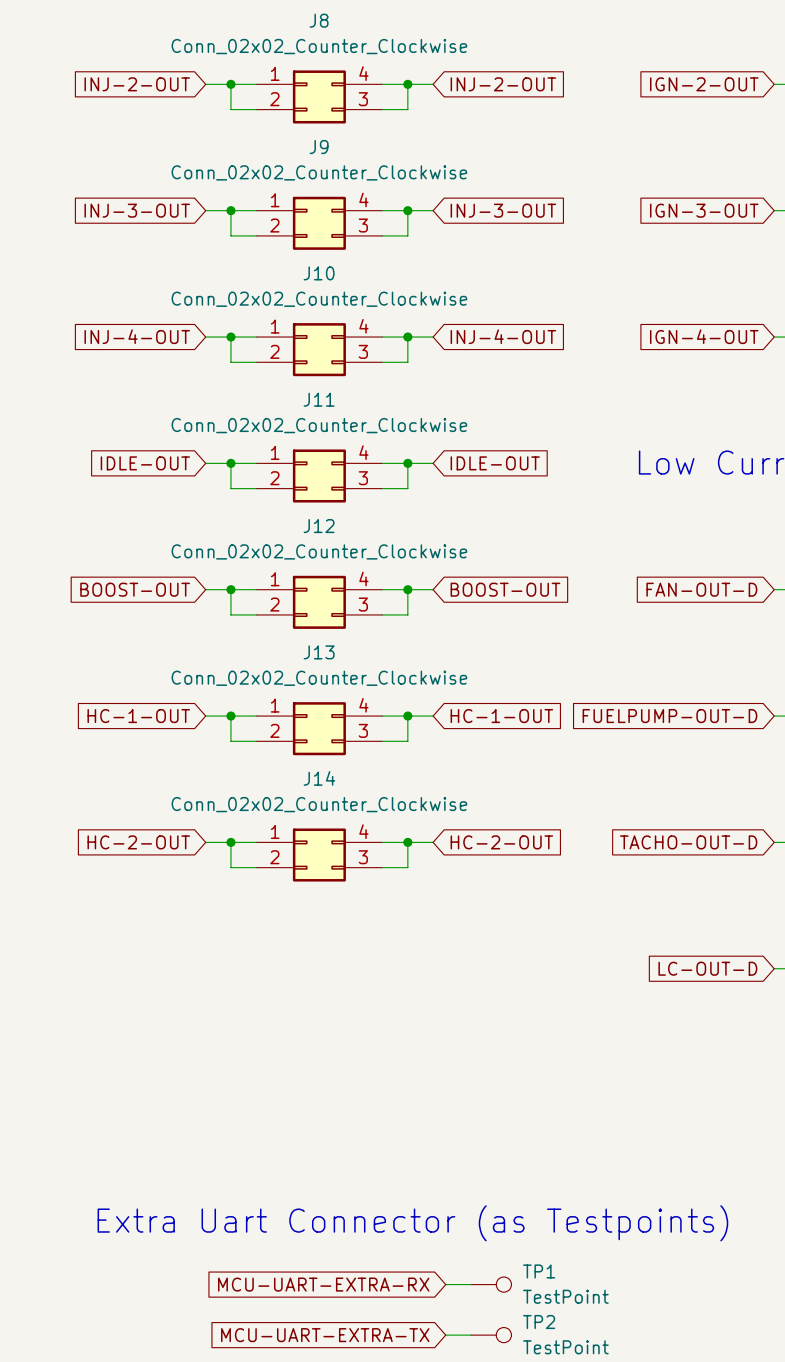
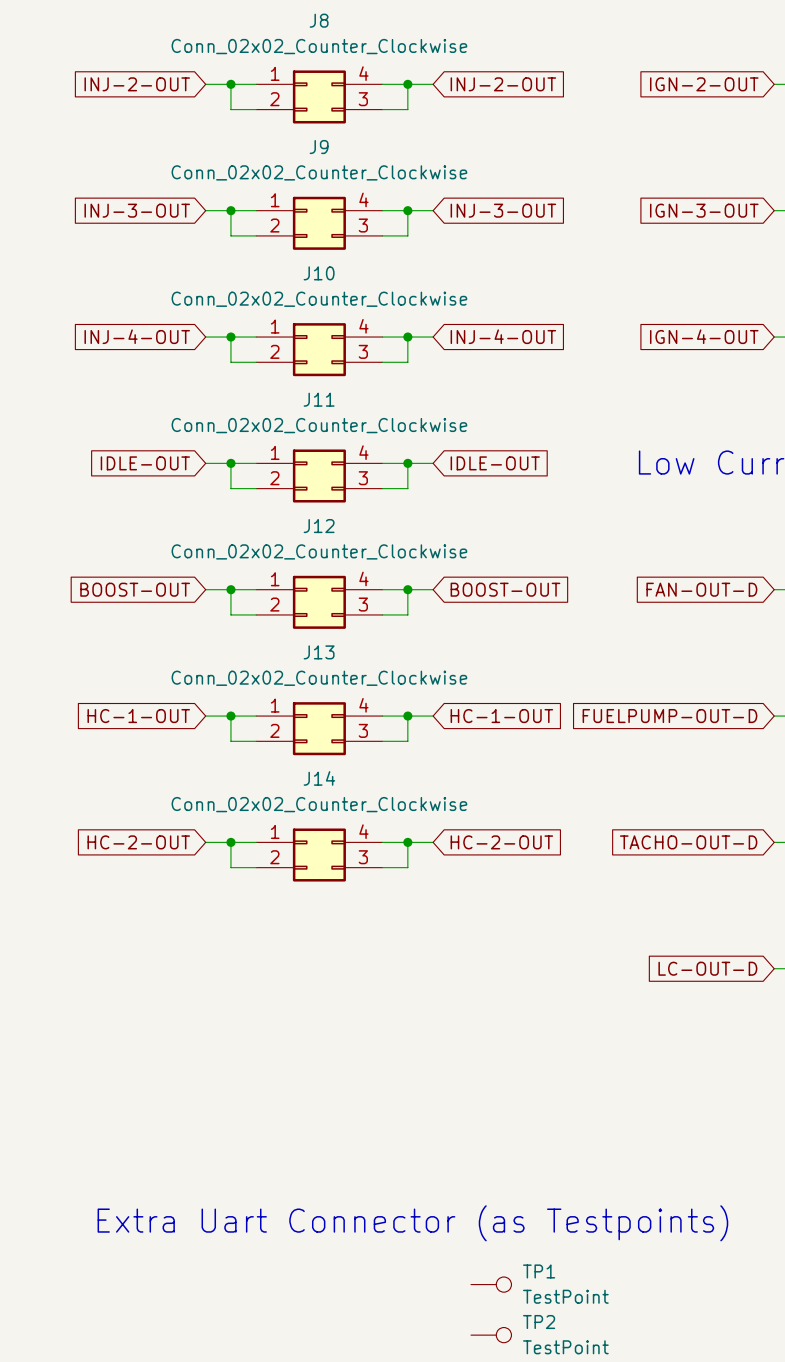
global label: MCU-UART-EXTRA-RX (323, 1284) -> none
wire: (445, 1284) (471, 1284) -> none
global label: MCU-UART-EXTRA-TX (325, 1335) -> none
wire: (445, 1335) (471, 1335) -> none

